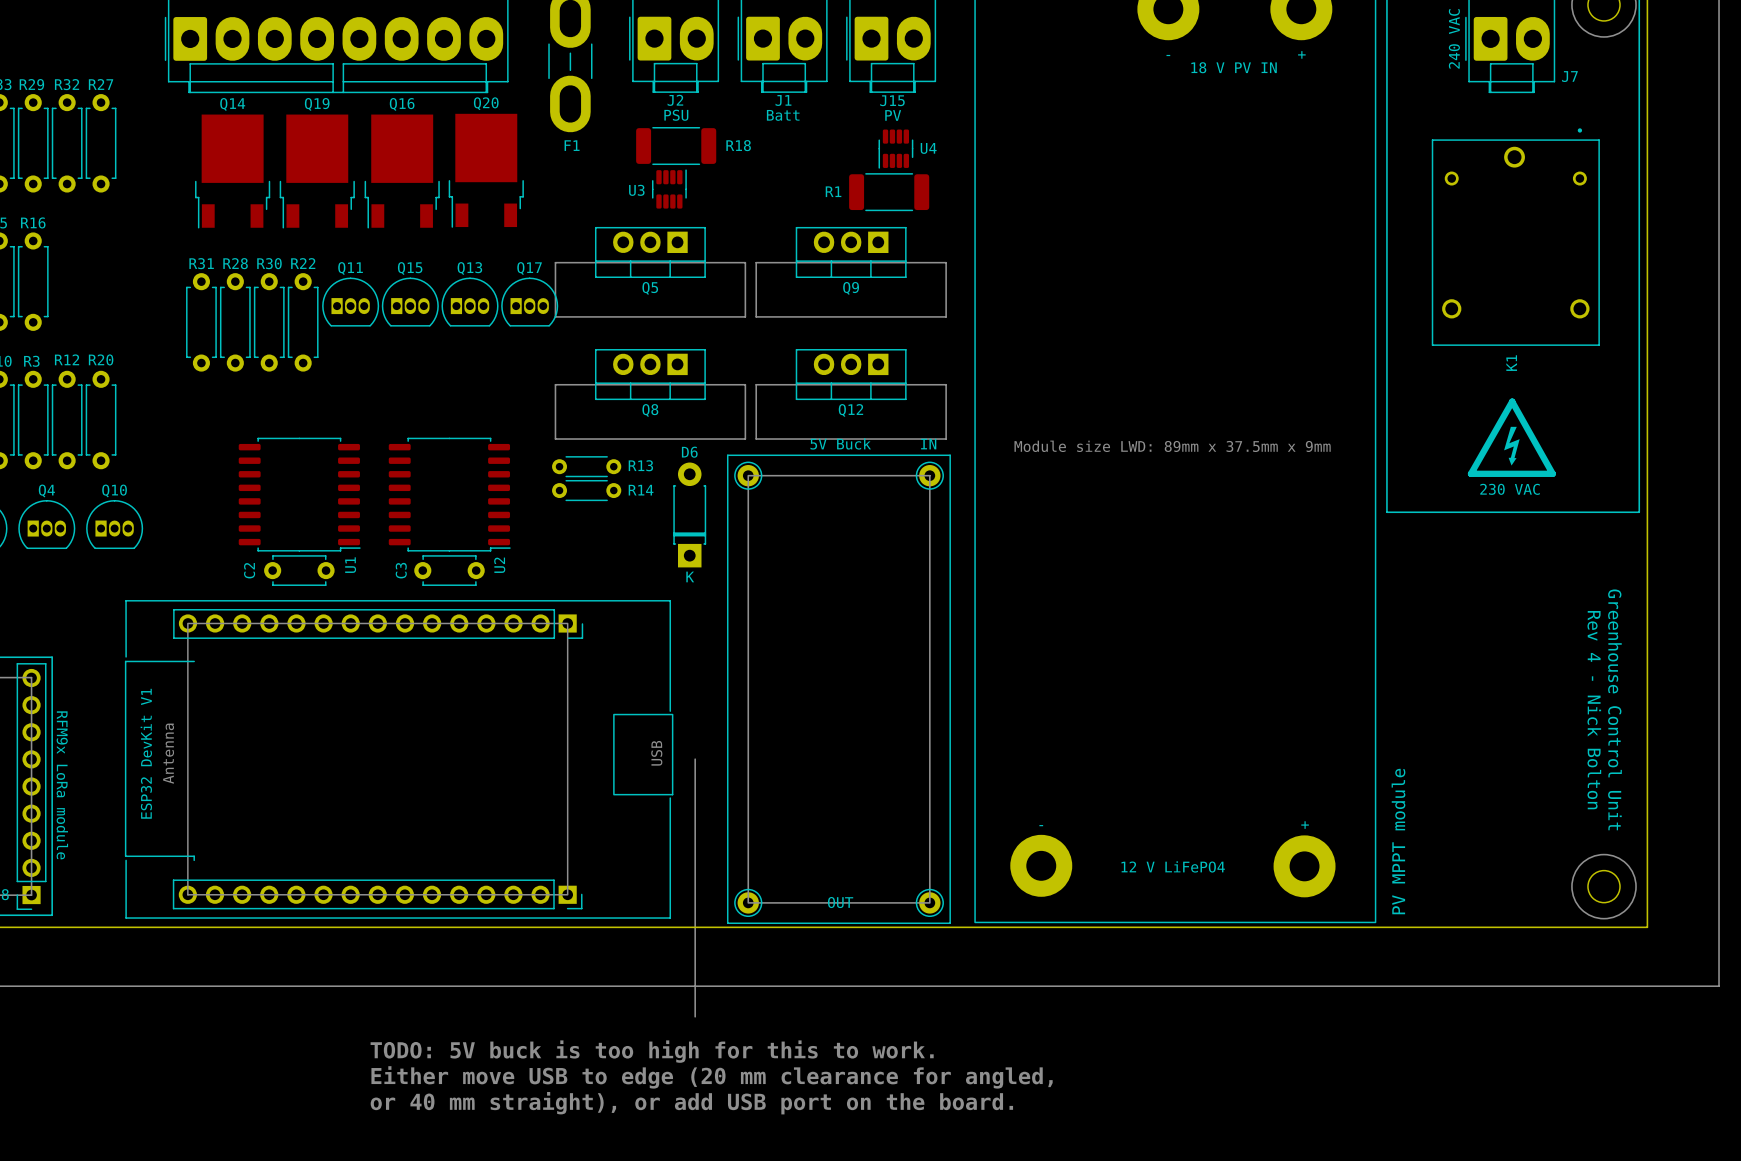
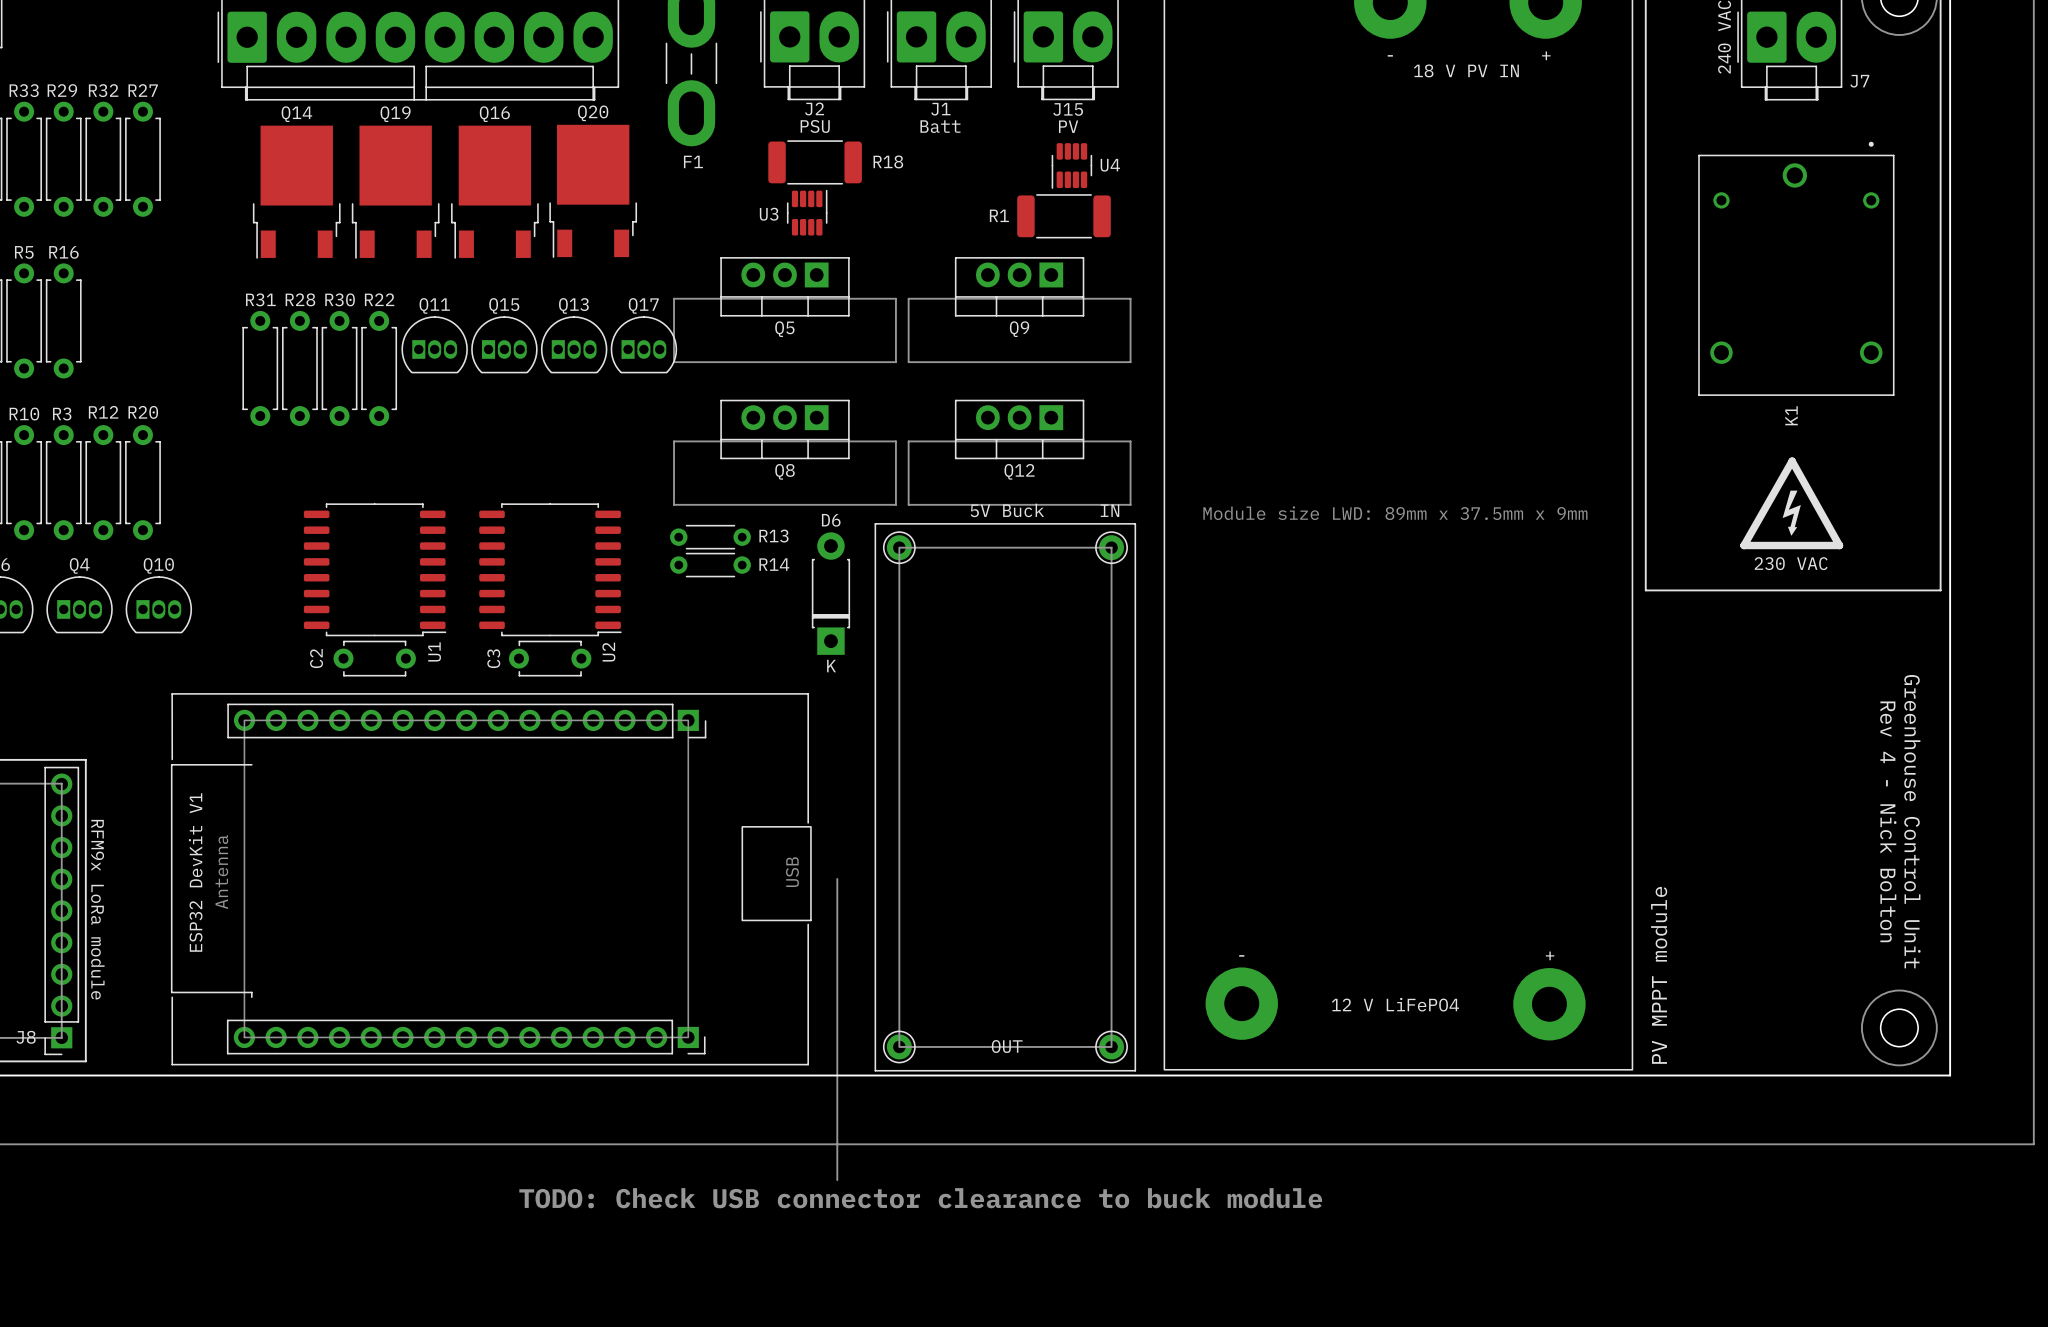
text: none -> TODO: Check USB connector clearance to buck module (920, 1198)
text: TODO: 5V buck is too high for this to work. (652, 1051) -> none
text: Either move USB to edge (20 mm clearance for angled, (712, 1077) -> none
text: or 40 mm straight), or add USB port on the board. (691, 1103) -> none

